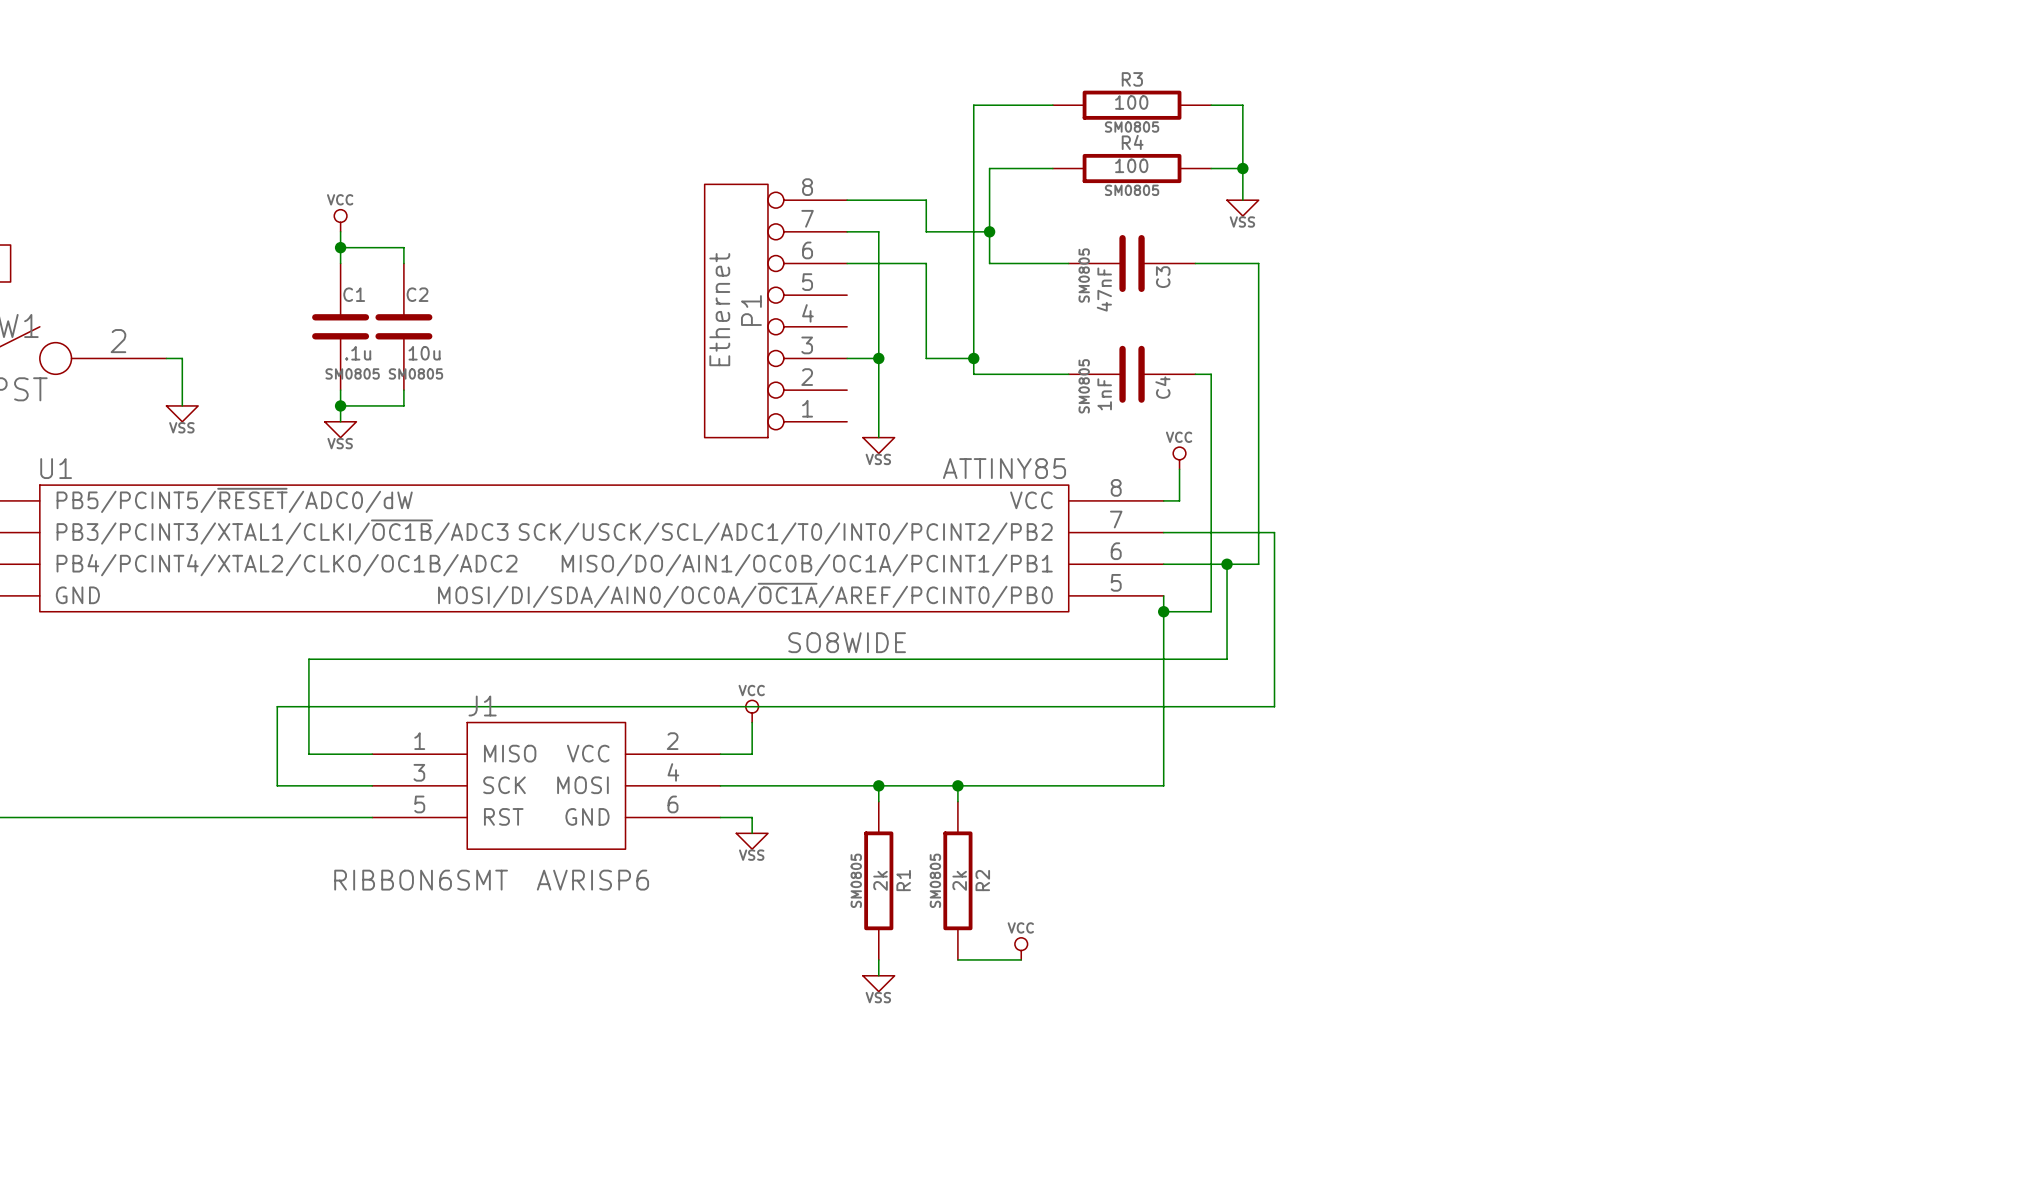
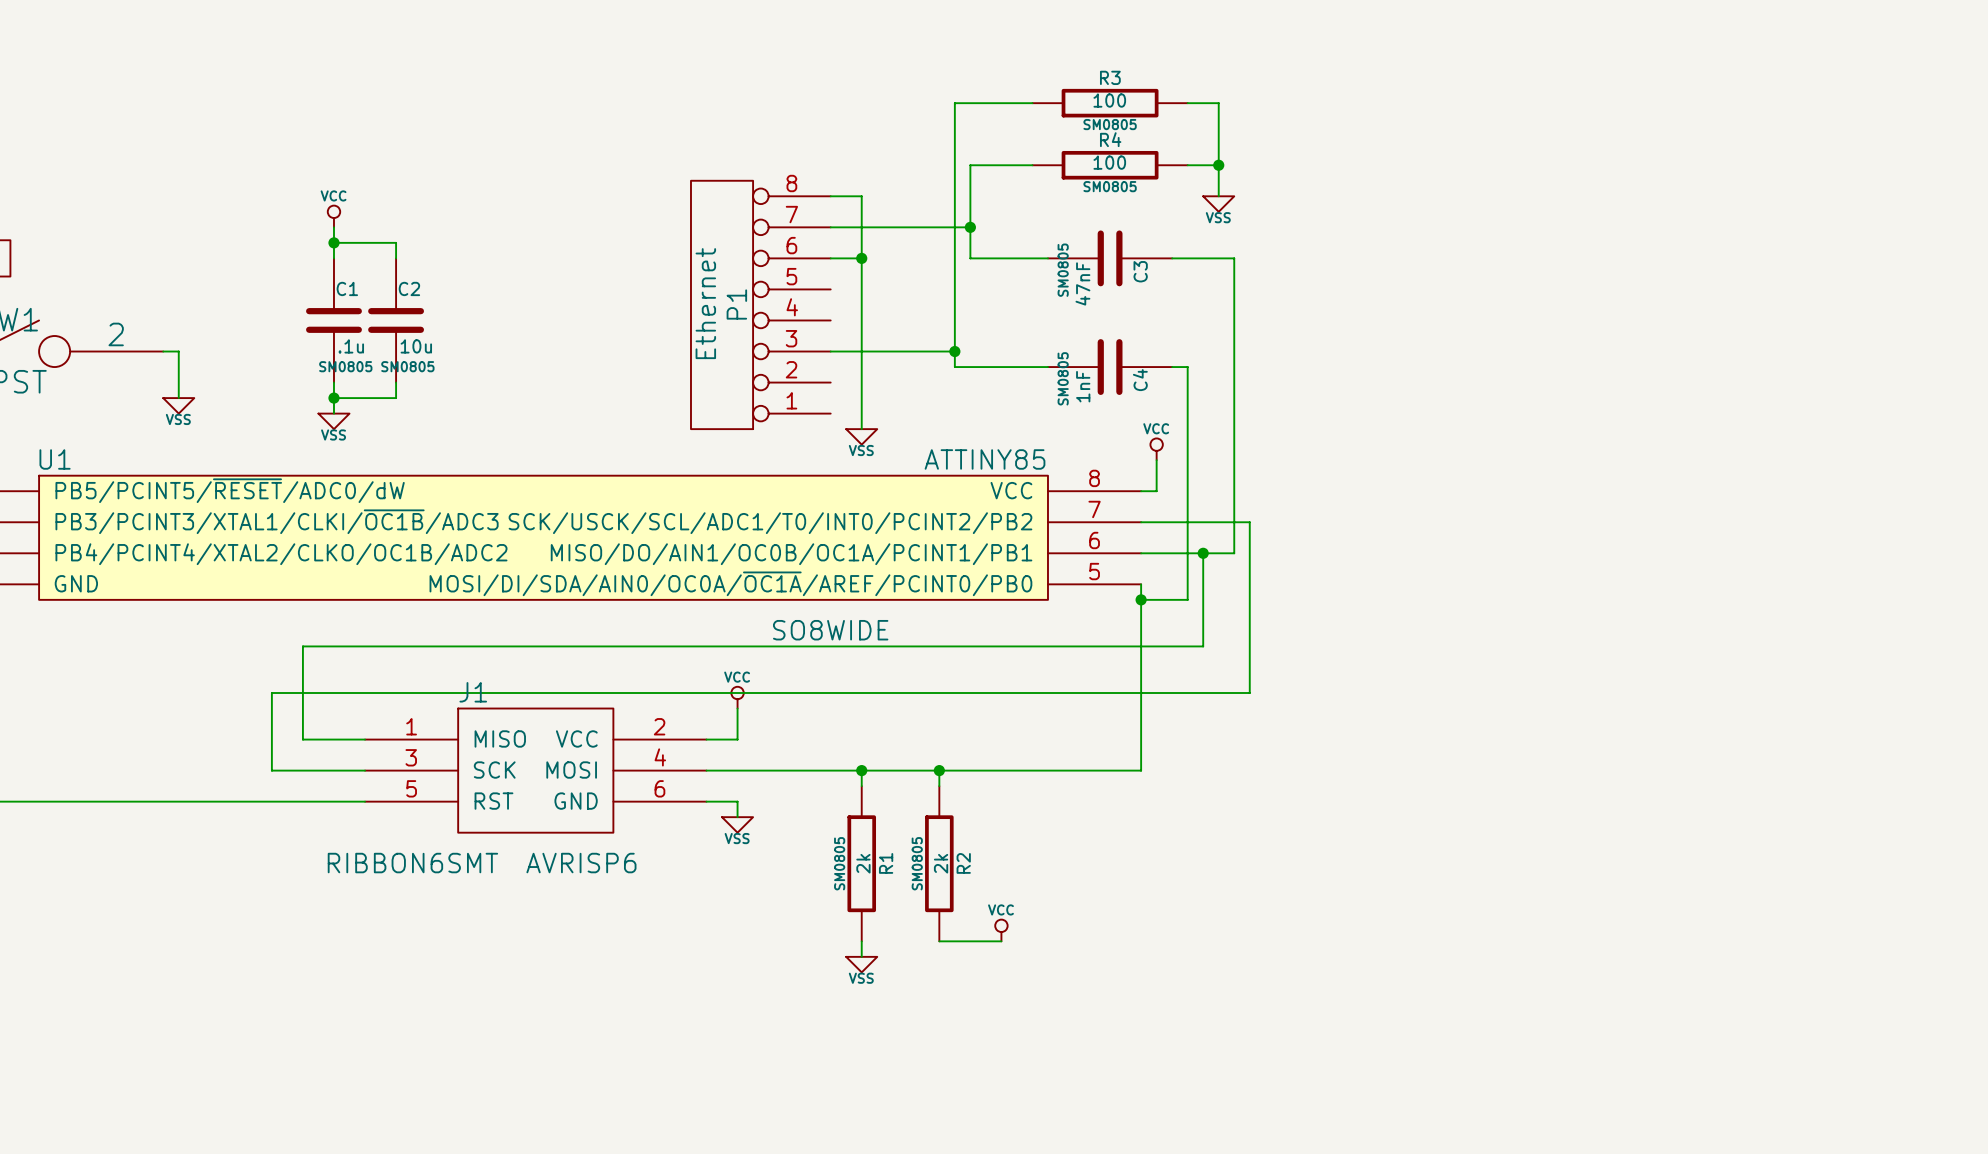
wire: (878, 200) (926, 200) (926, 231) -> (861, 196) (861, 227) (908, 227)
wire: (878, 263) (926, 263) (926, 358) -> (861, 351) (908, 351)
junction: none -> (861, 258)
junction: (878, 358) -> none

